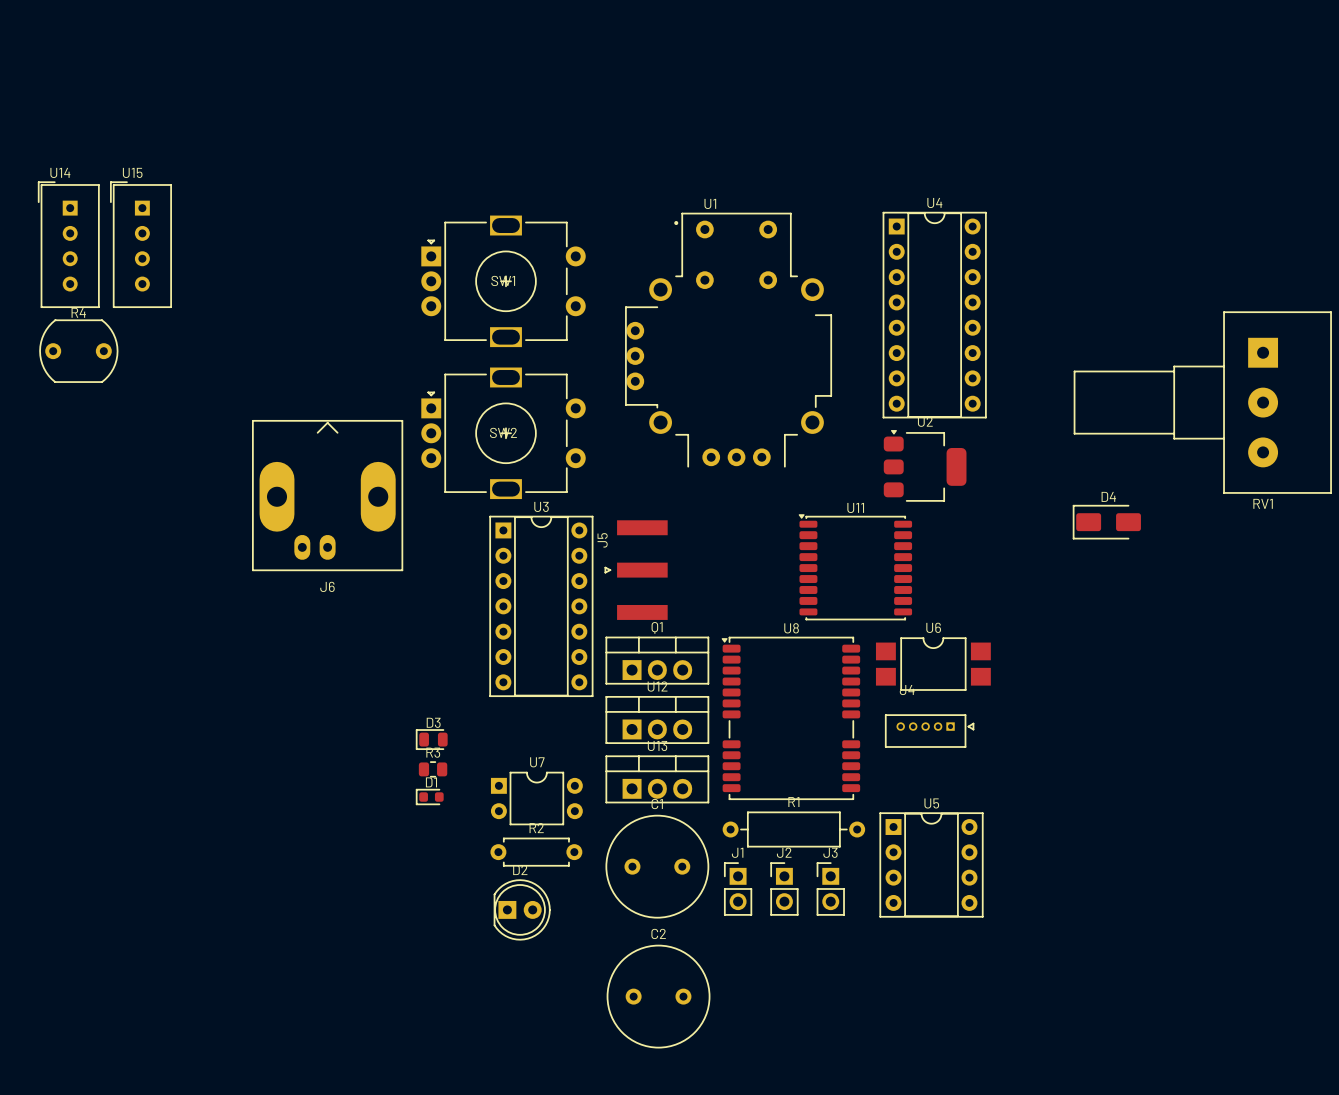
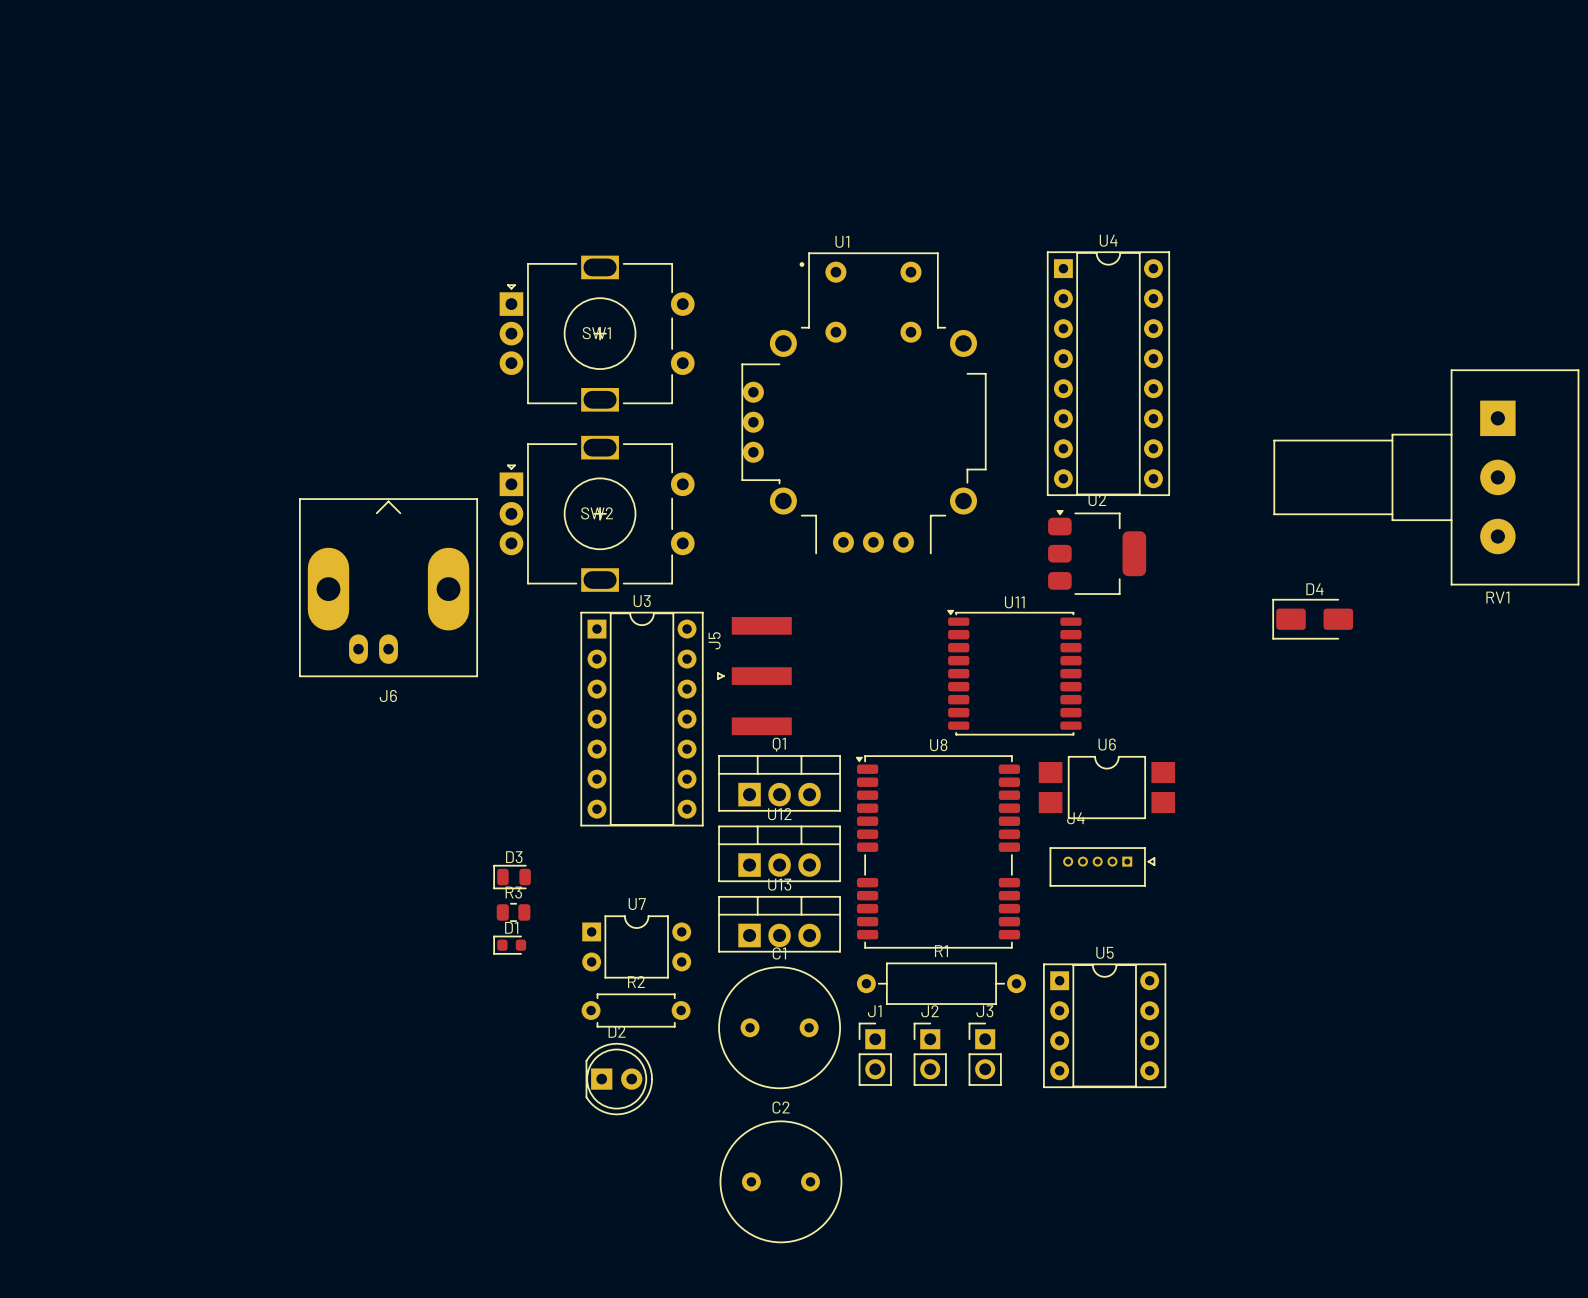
U14: (68, 244) -> none
U15: (141, 244) -> none
R4: (78, 351) -> none

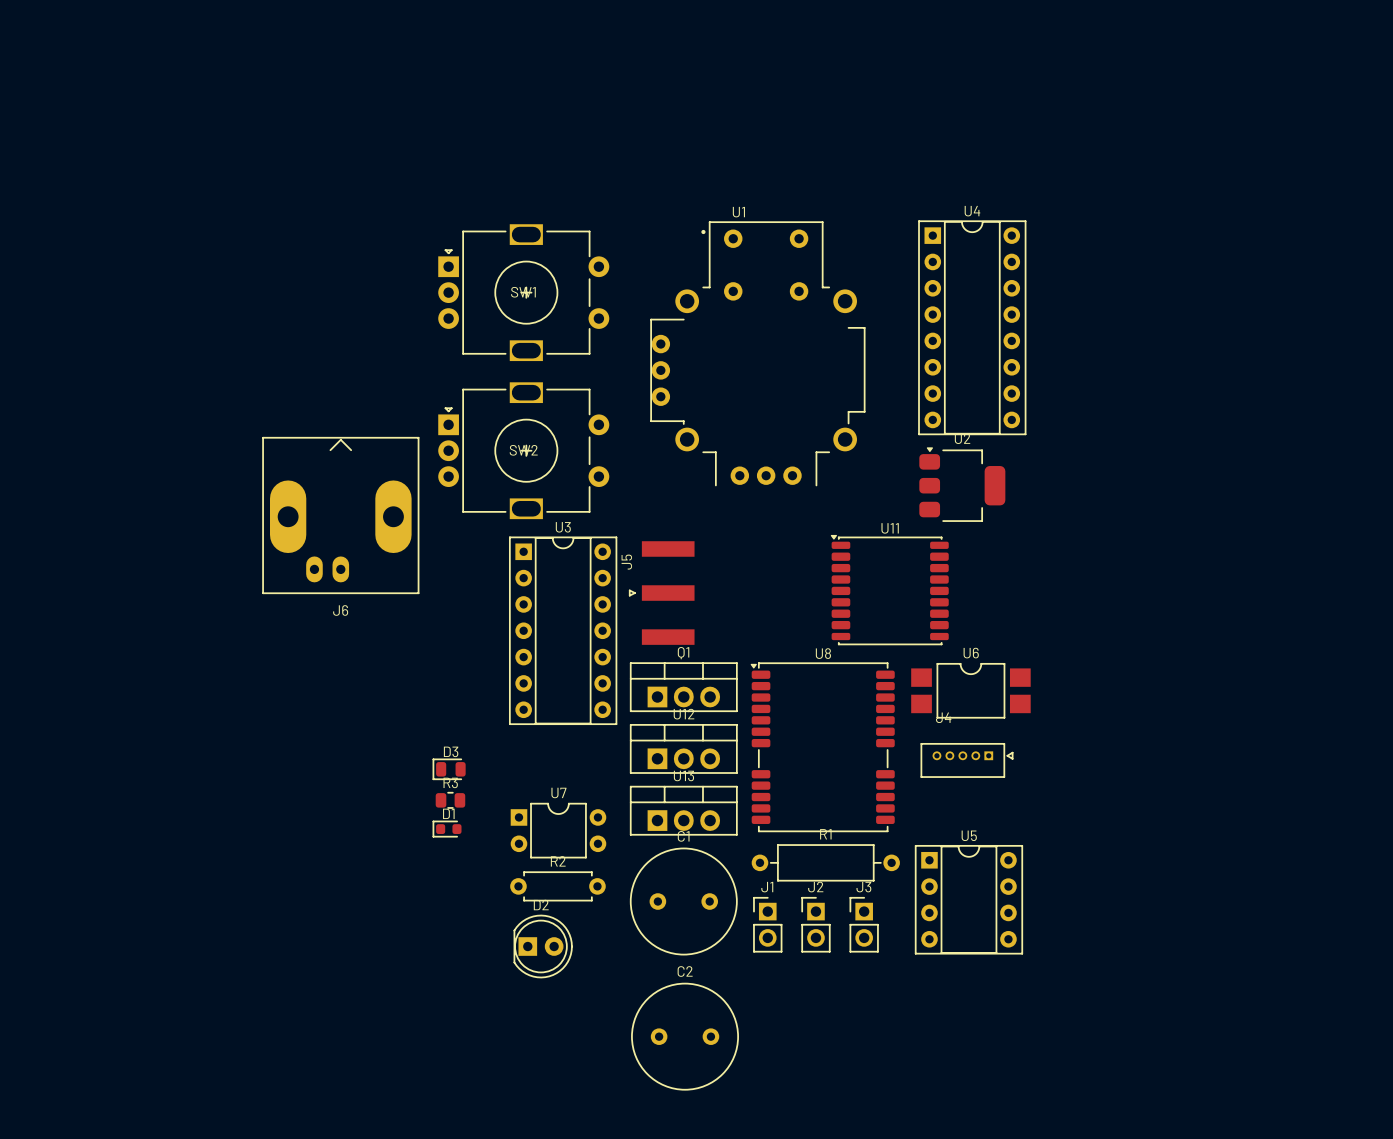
RV1: (1426, 477) -> none
D4: (1312, 619) -> none

